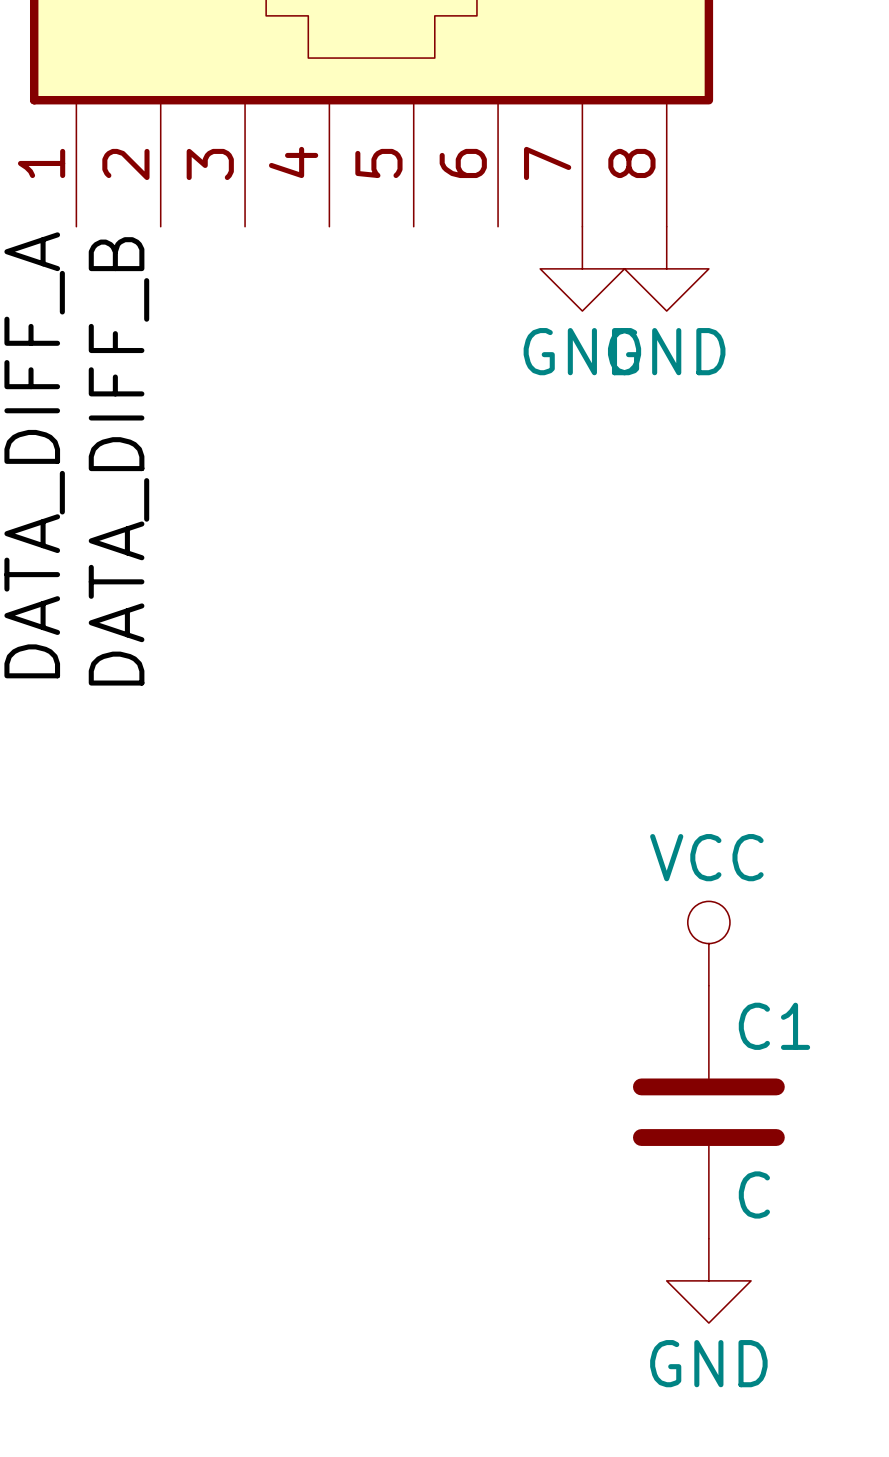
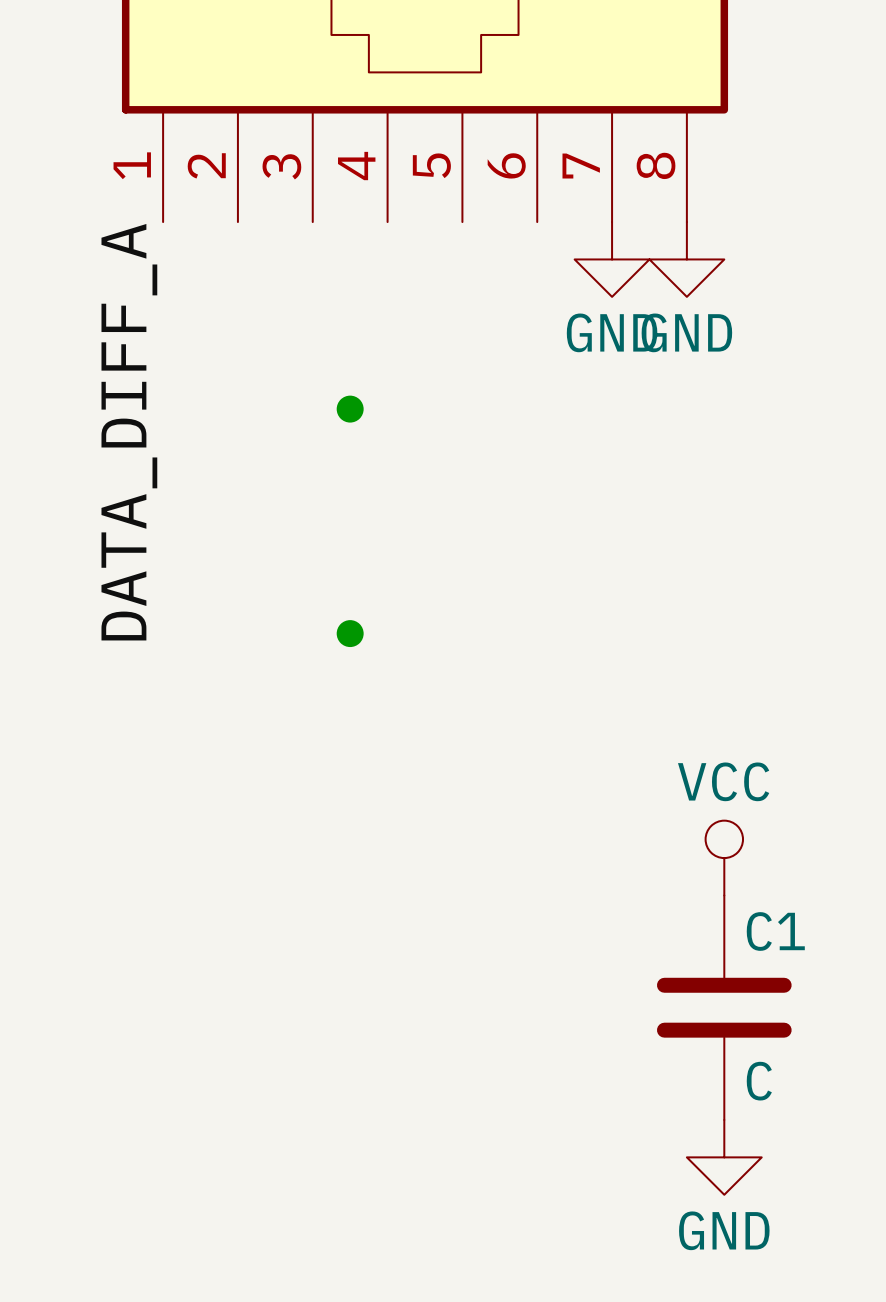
junction: none -> (350, 409)
label: DATA_DIFF_B (118, 461) -> none
junction: none -> (350, 633)

